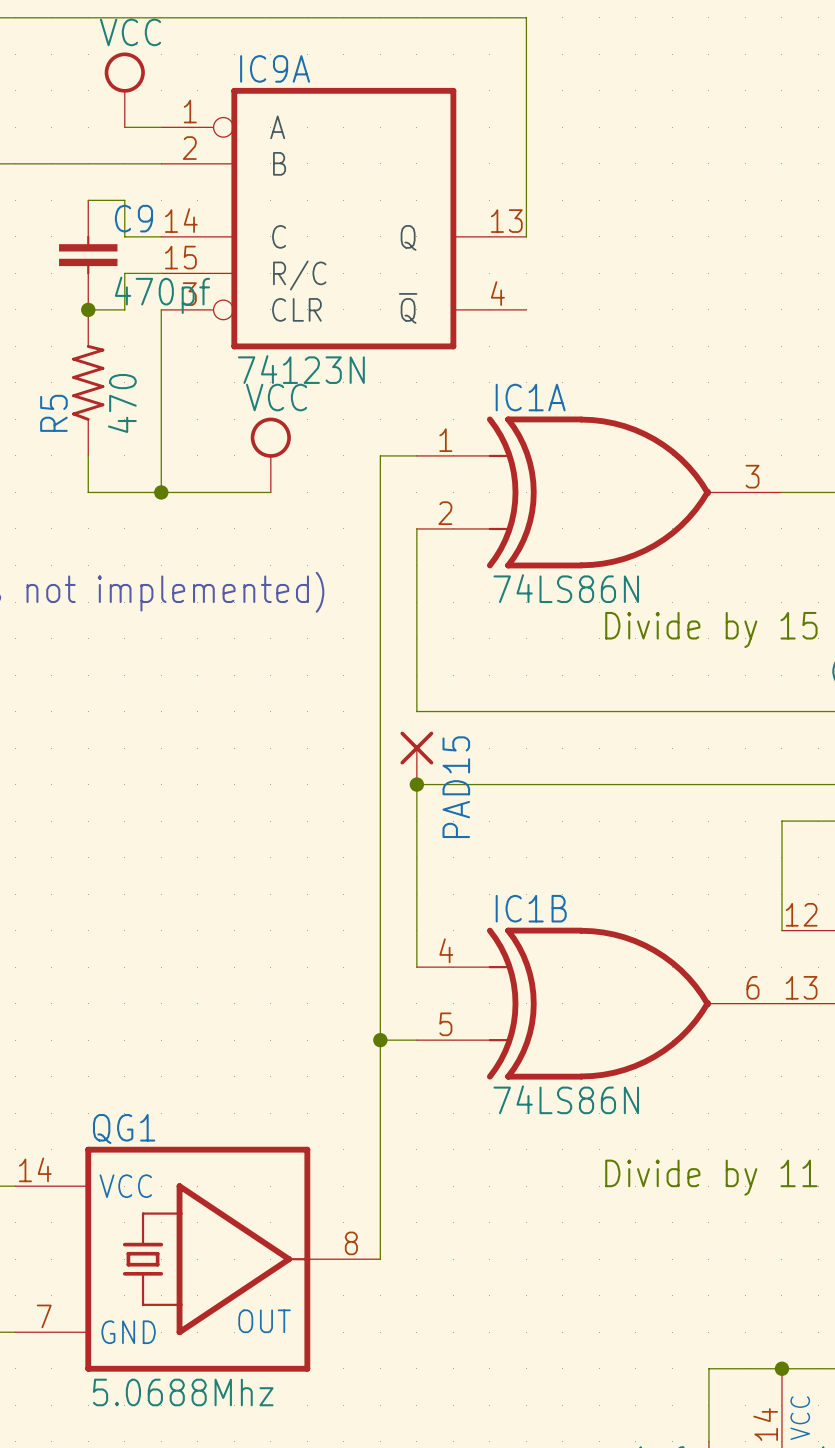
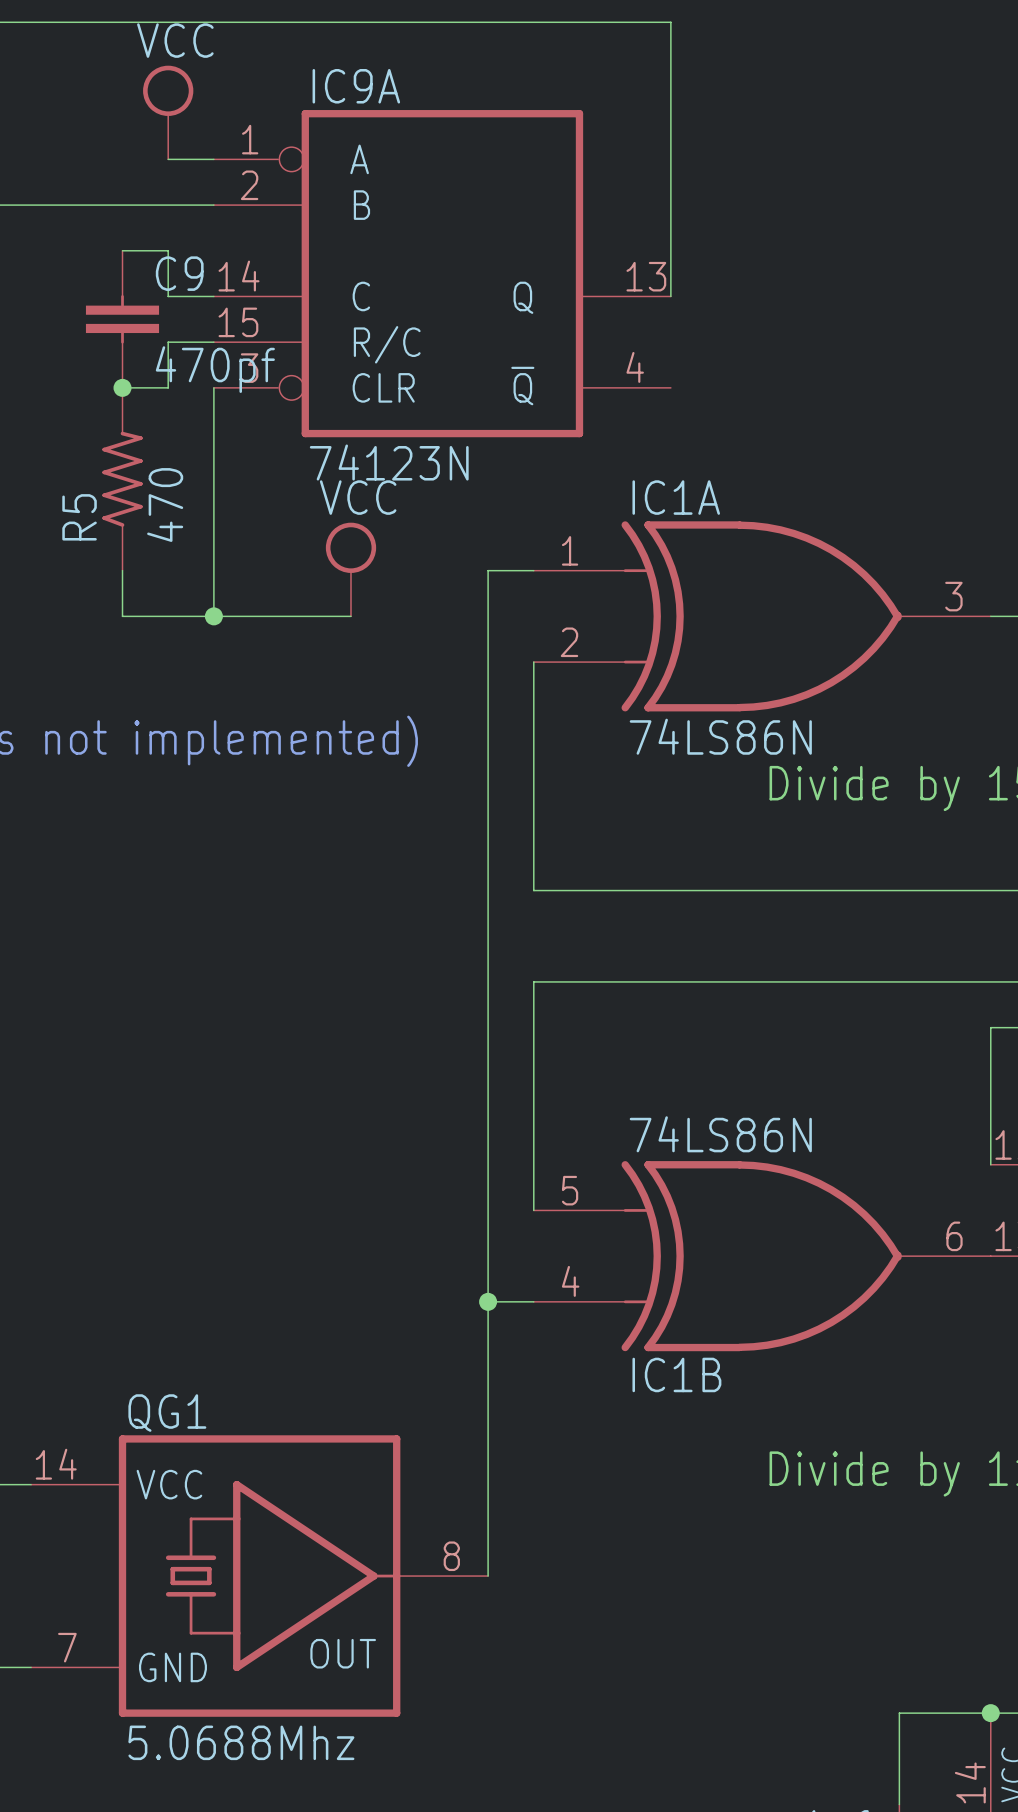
PAD15: (416, 758) -> none
junction: (416, 784) -> none
IC1B flip: as is (598, 1003) -> up-down (761, 1256)

